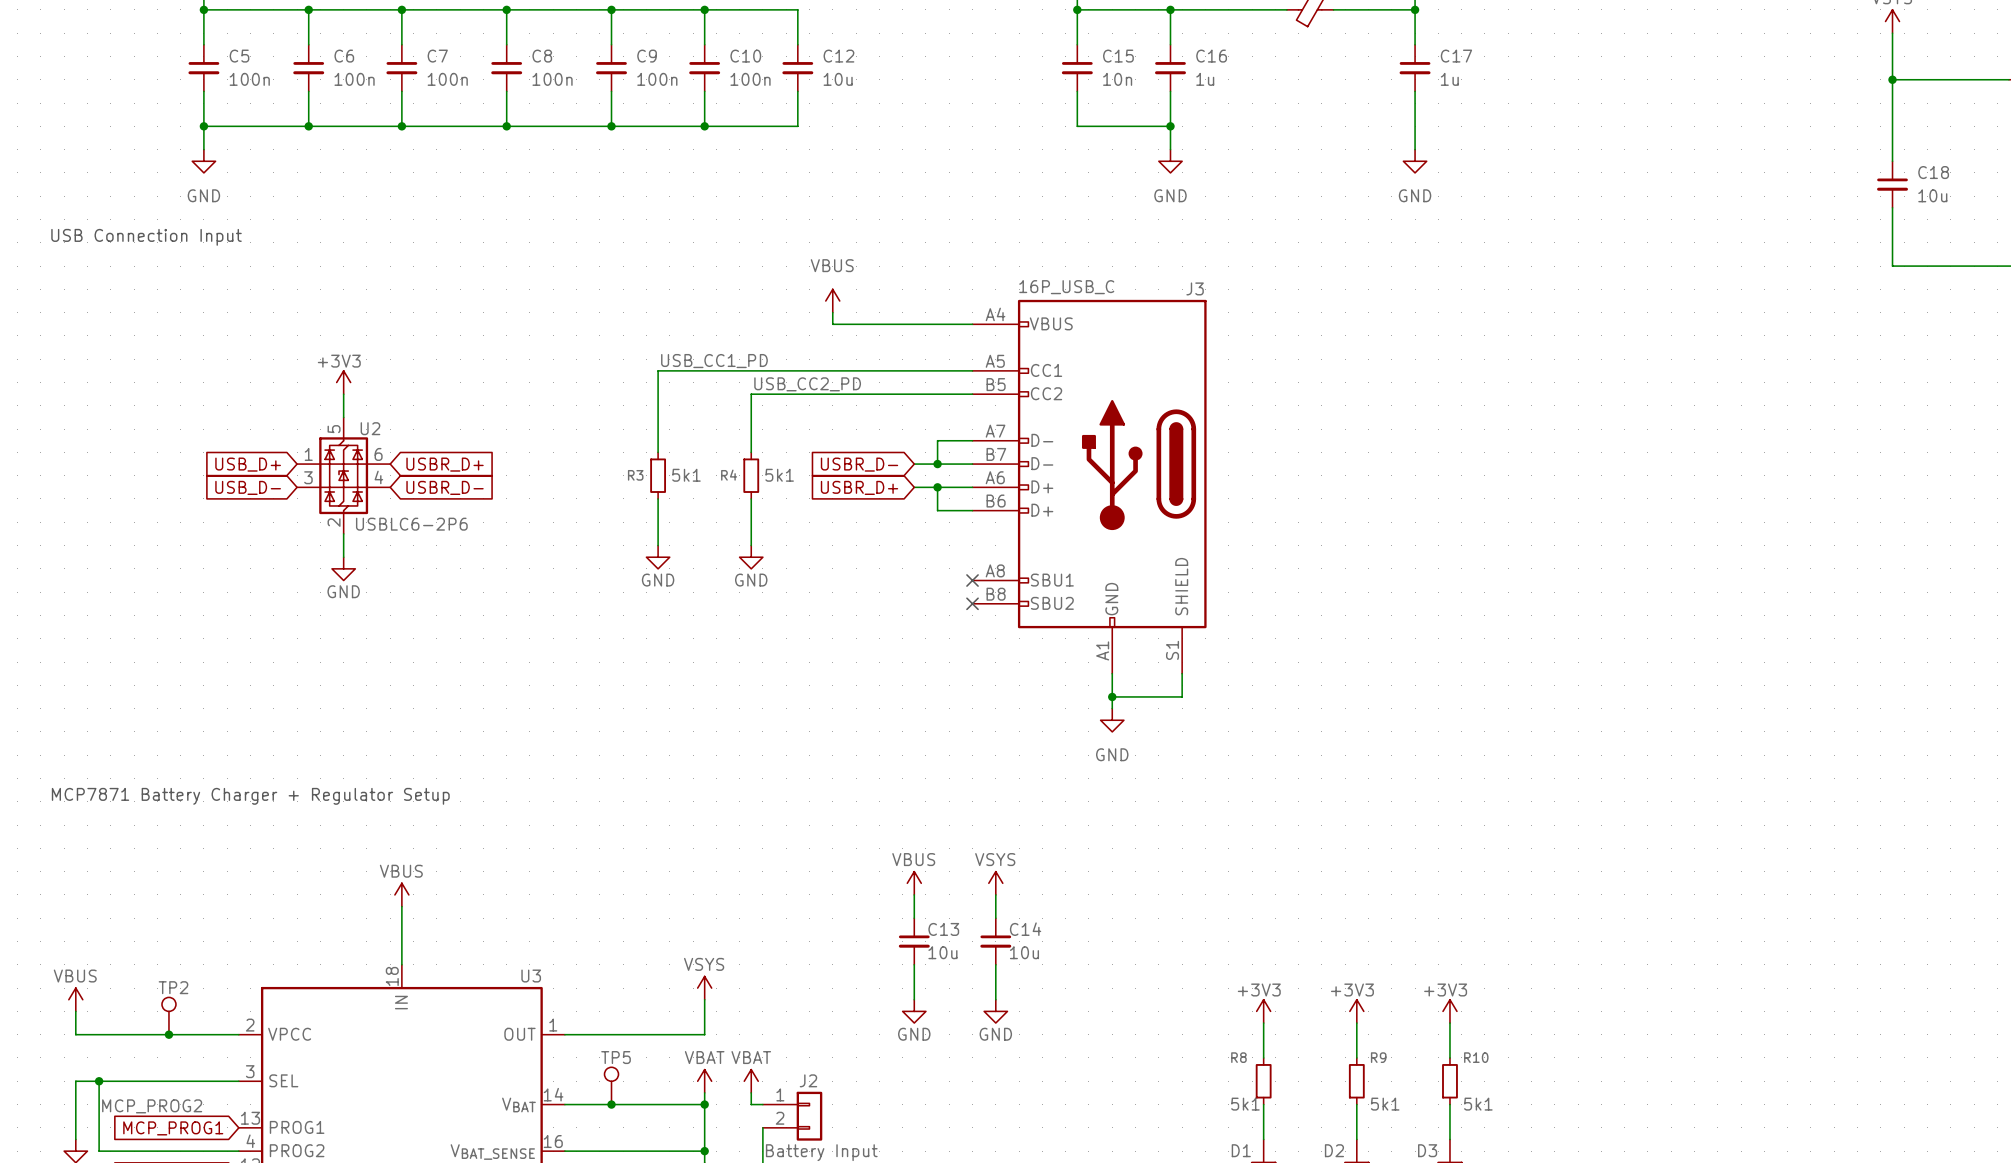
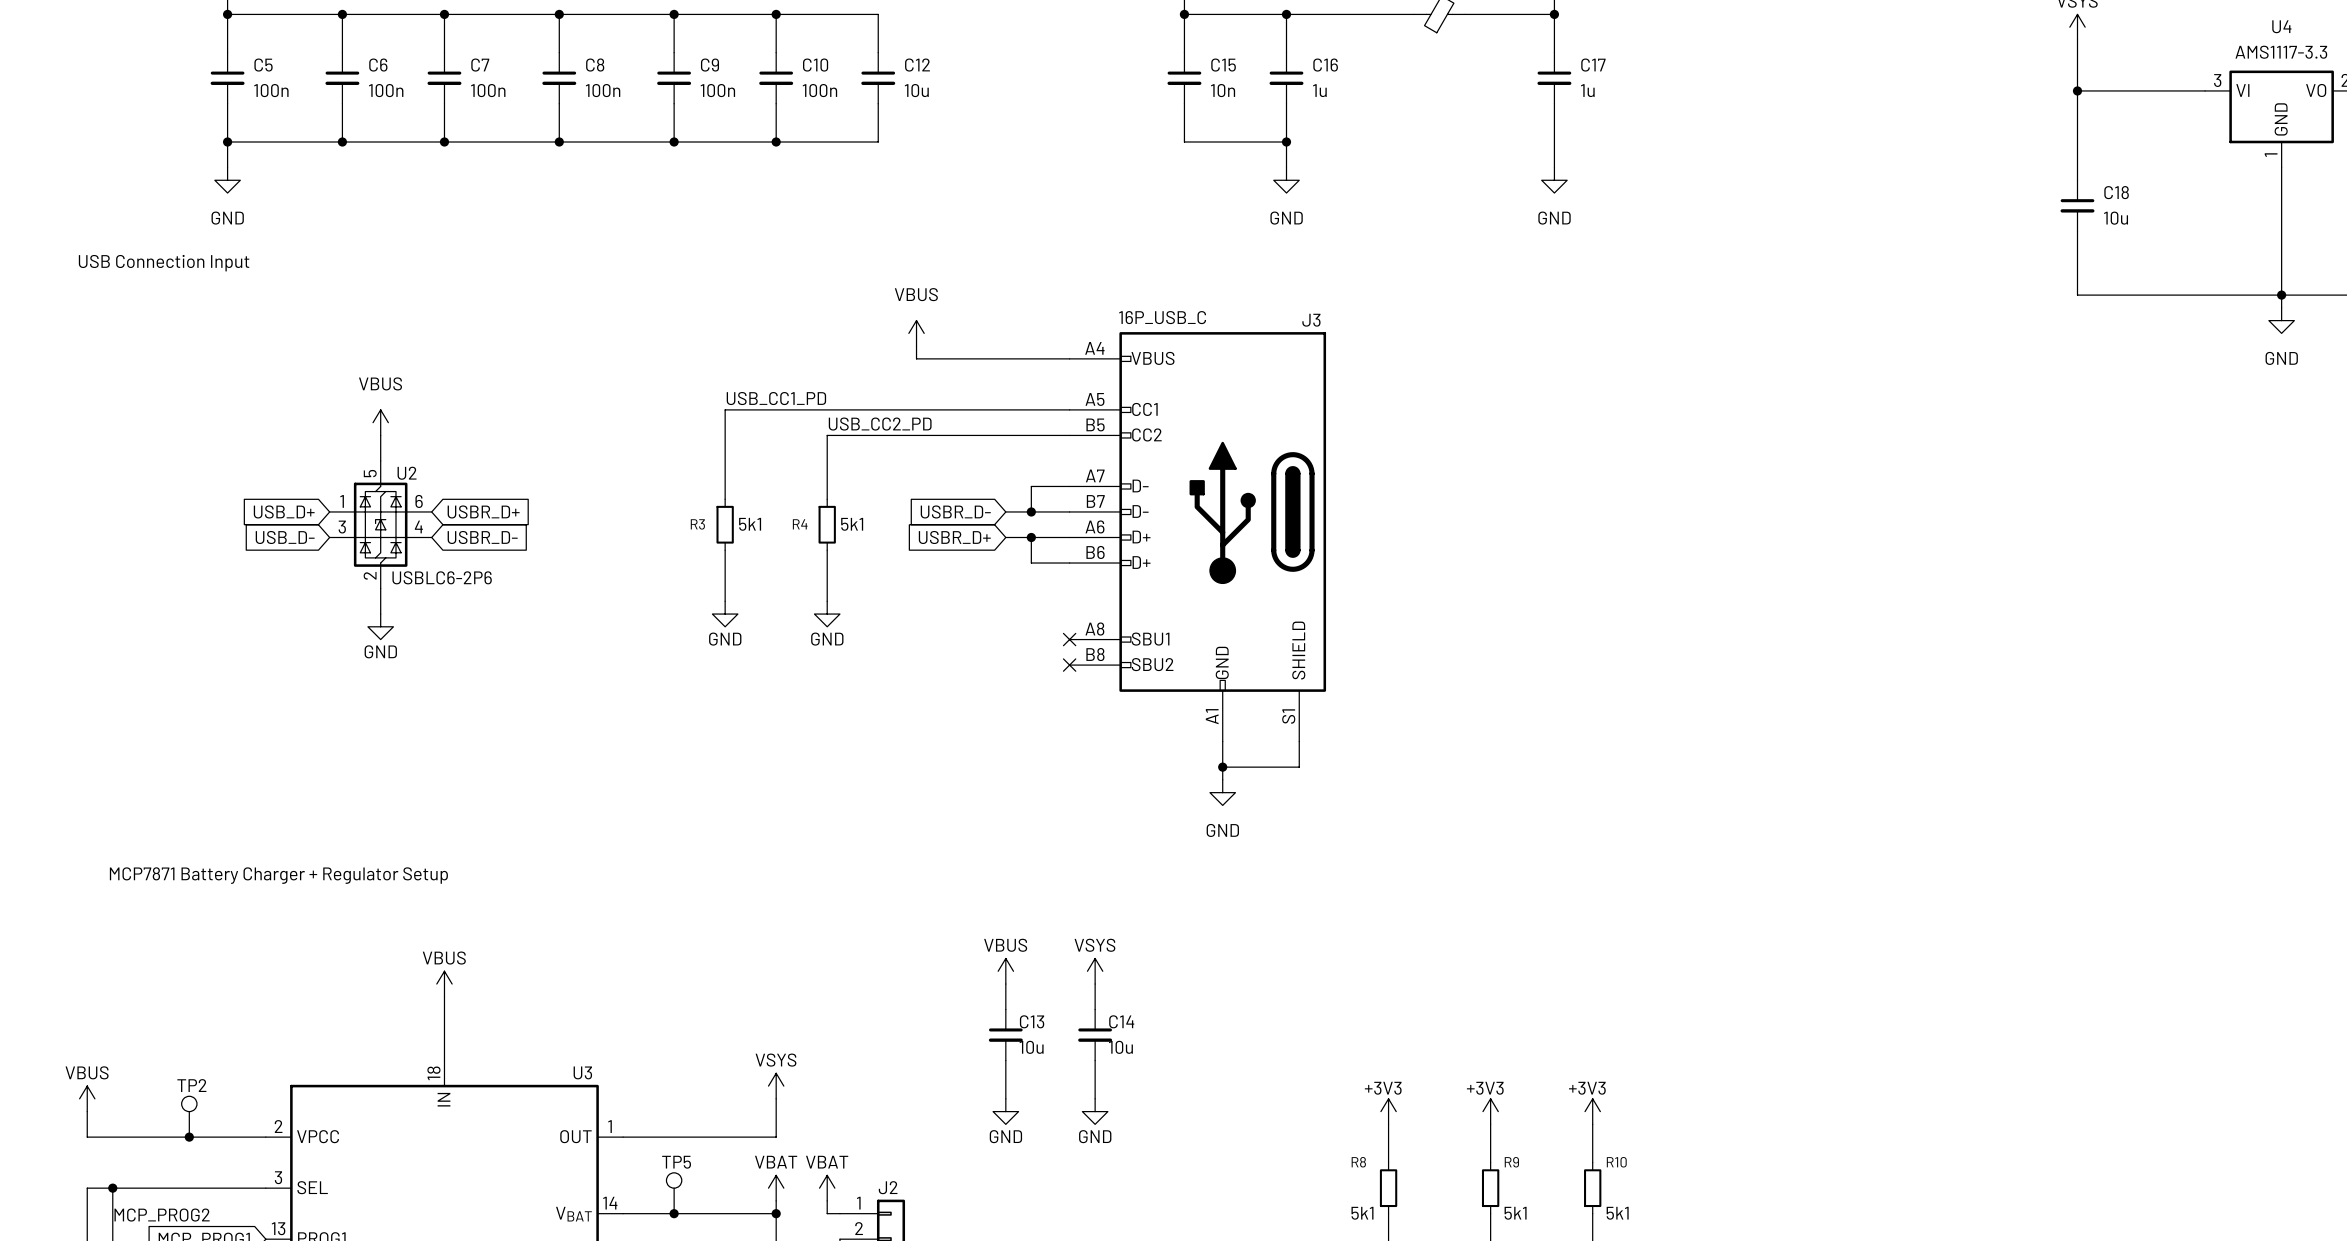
power symbol: +3V3 (343, 382) -> VBUS (380, 422)

